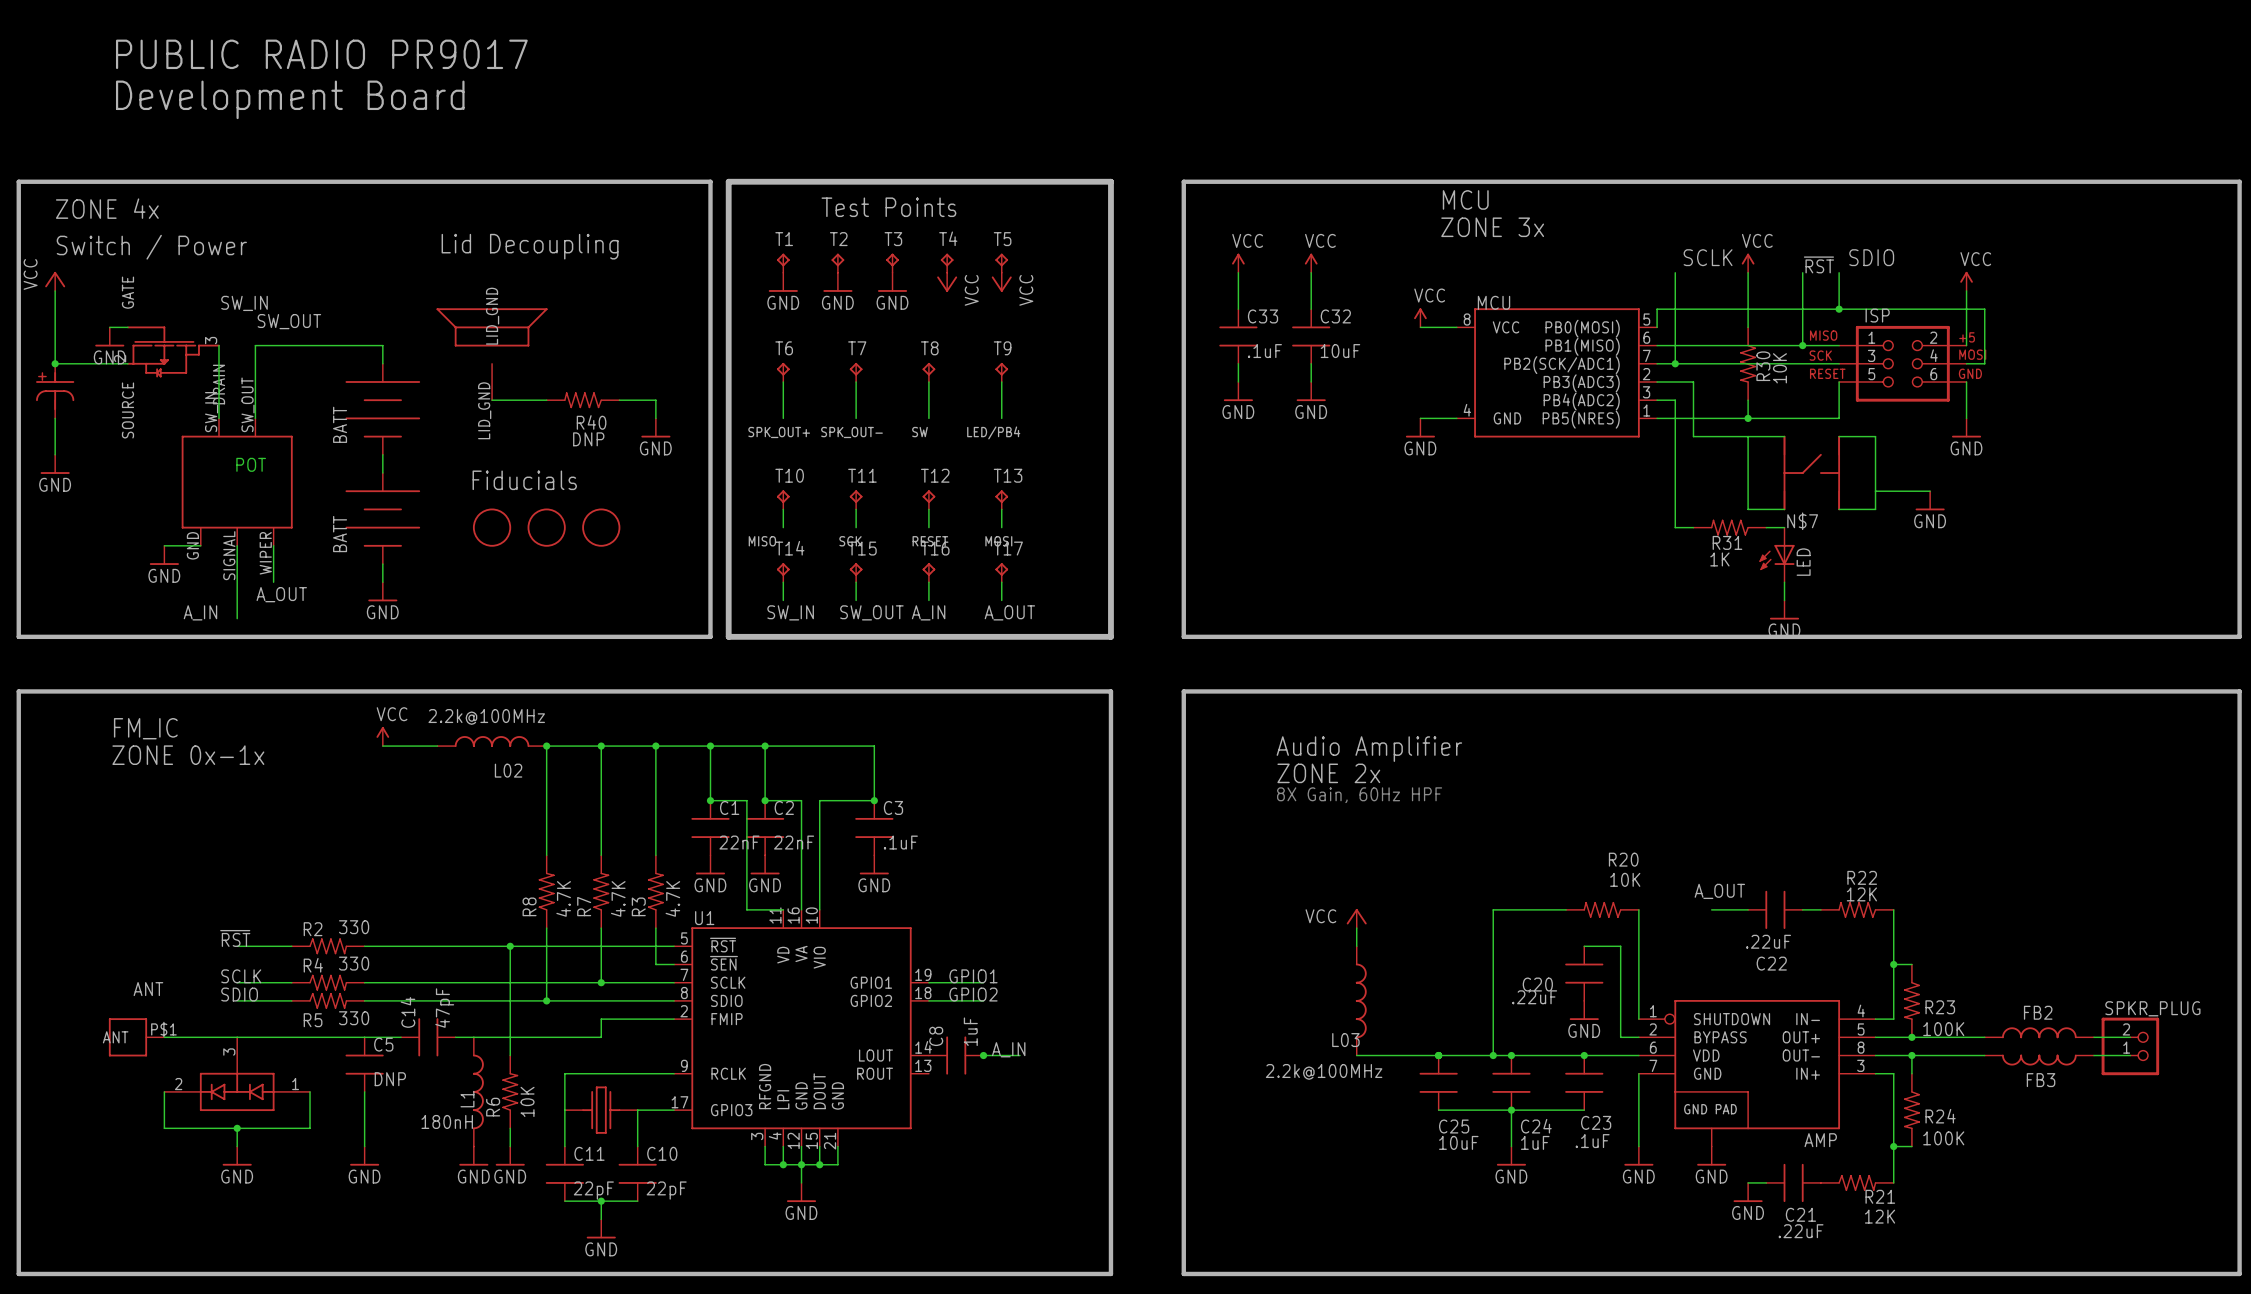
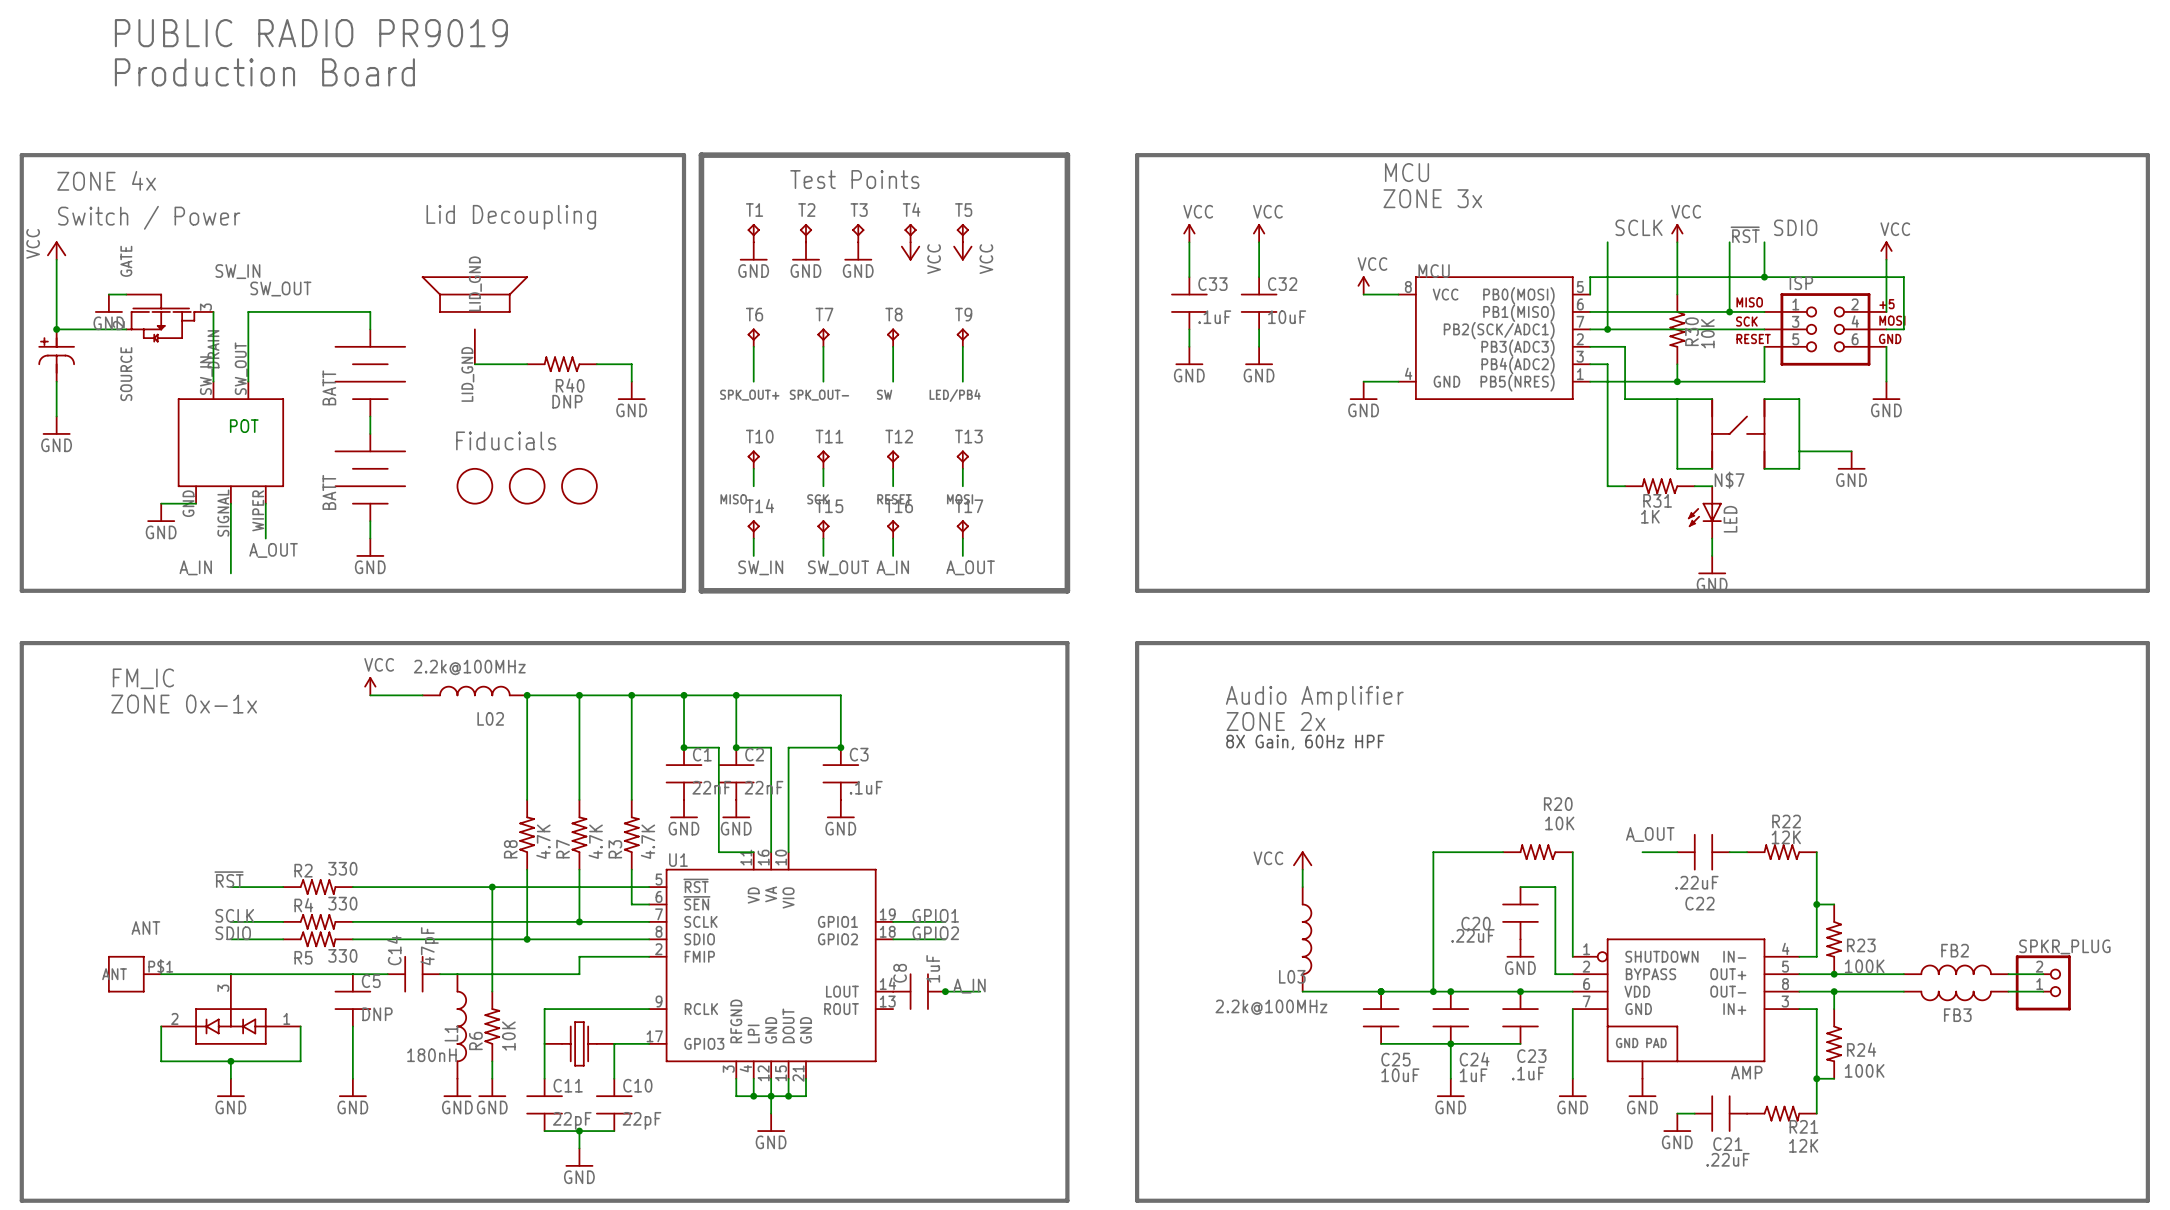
text: PUBLIC RADIO PR9017 (321, 54) -> PUBLIC RADIO PR9019 (311, 33)
text: Development Board (290, 99) -> Production Board (264, 72)

